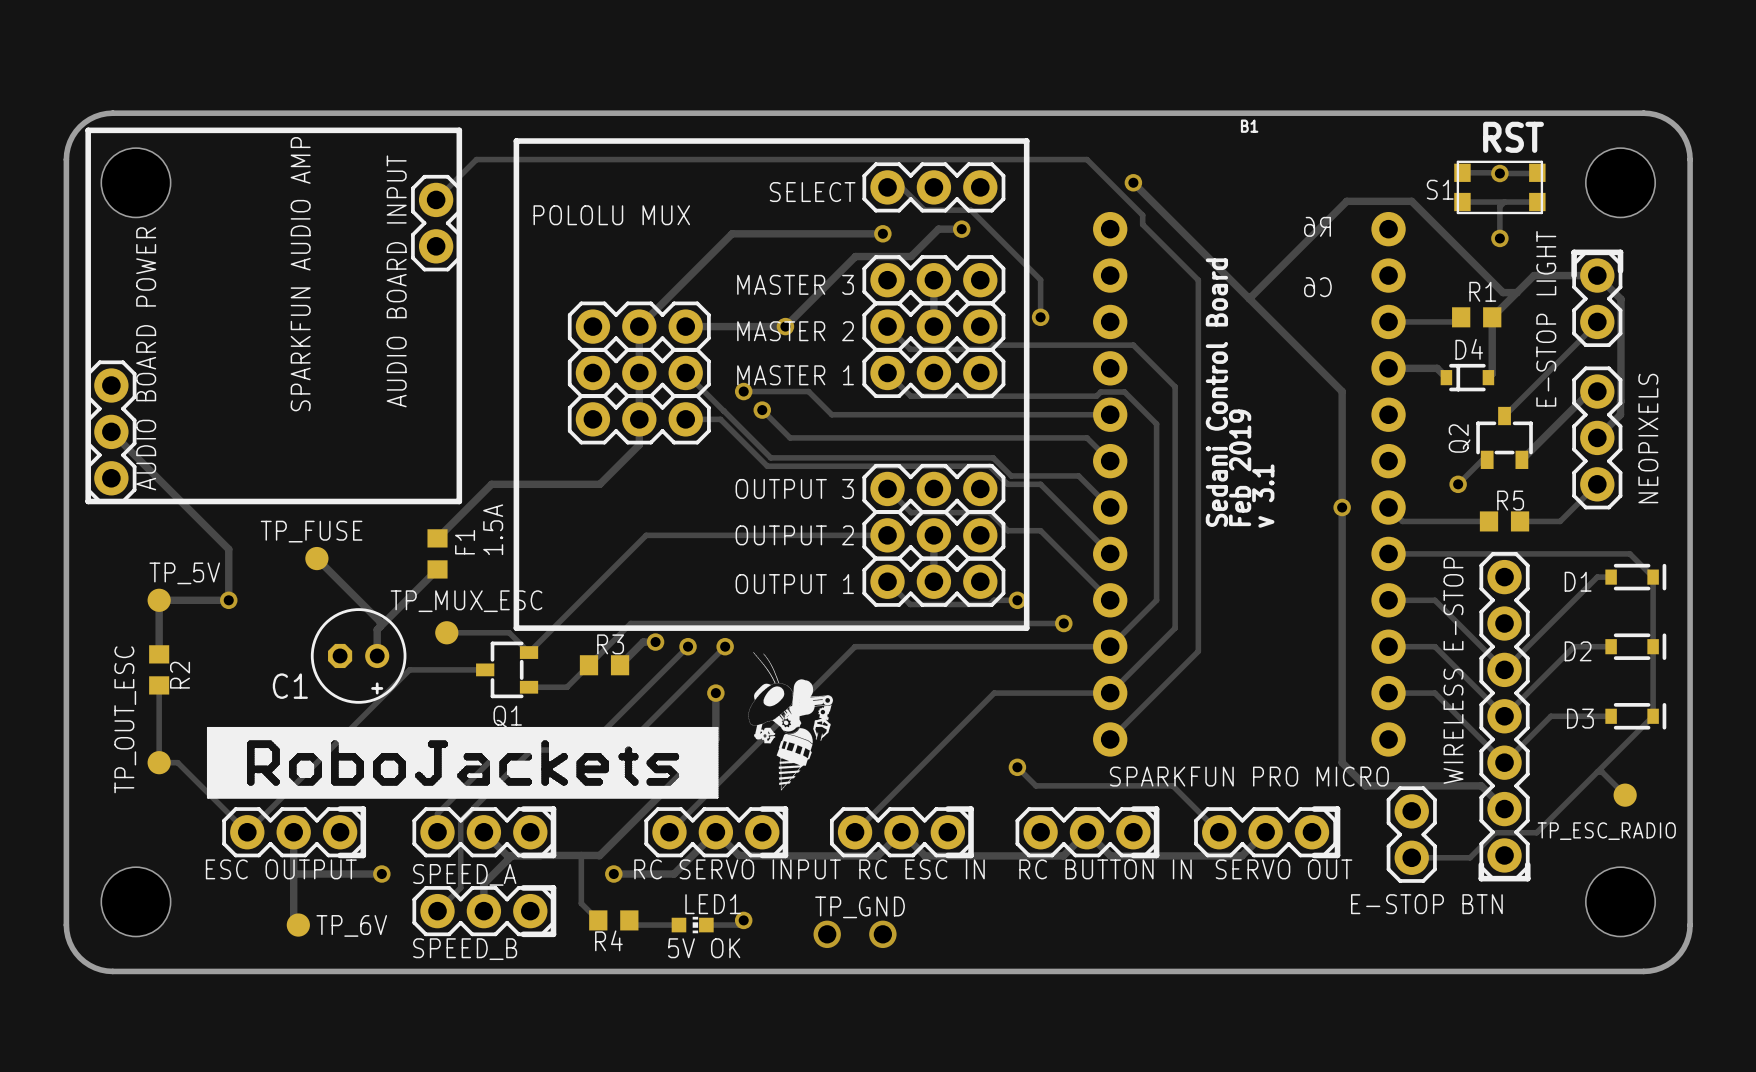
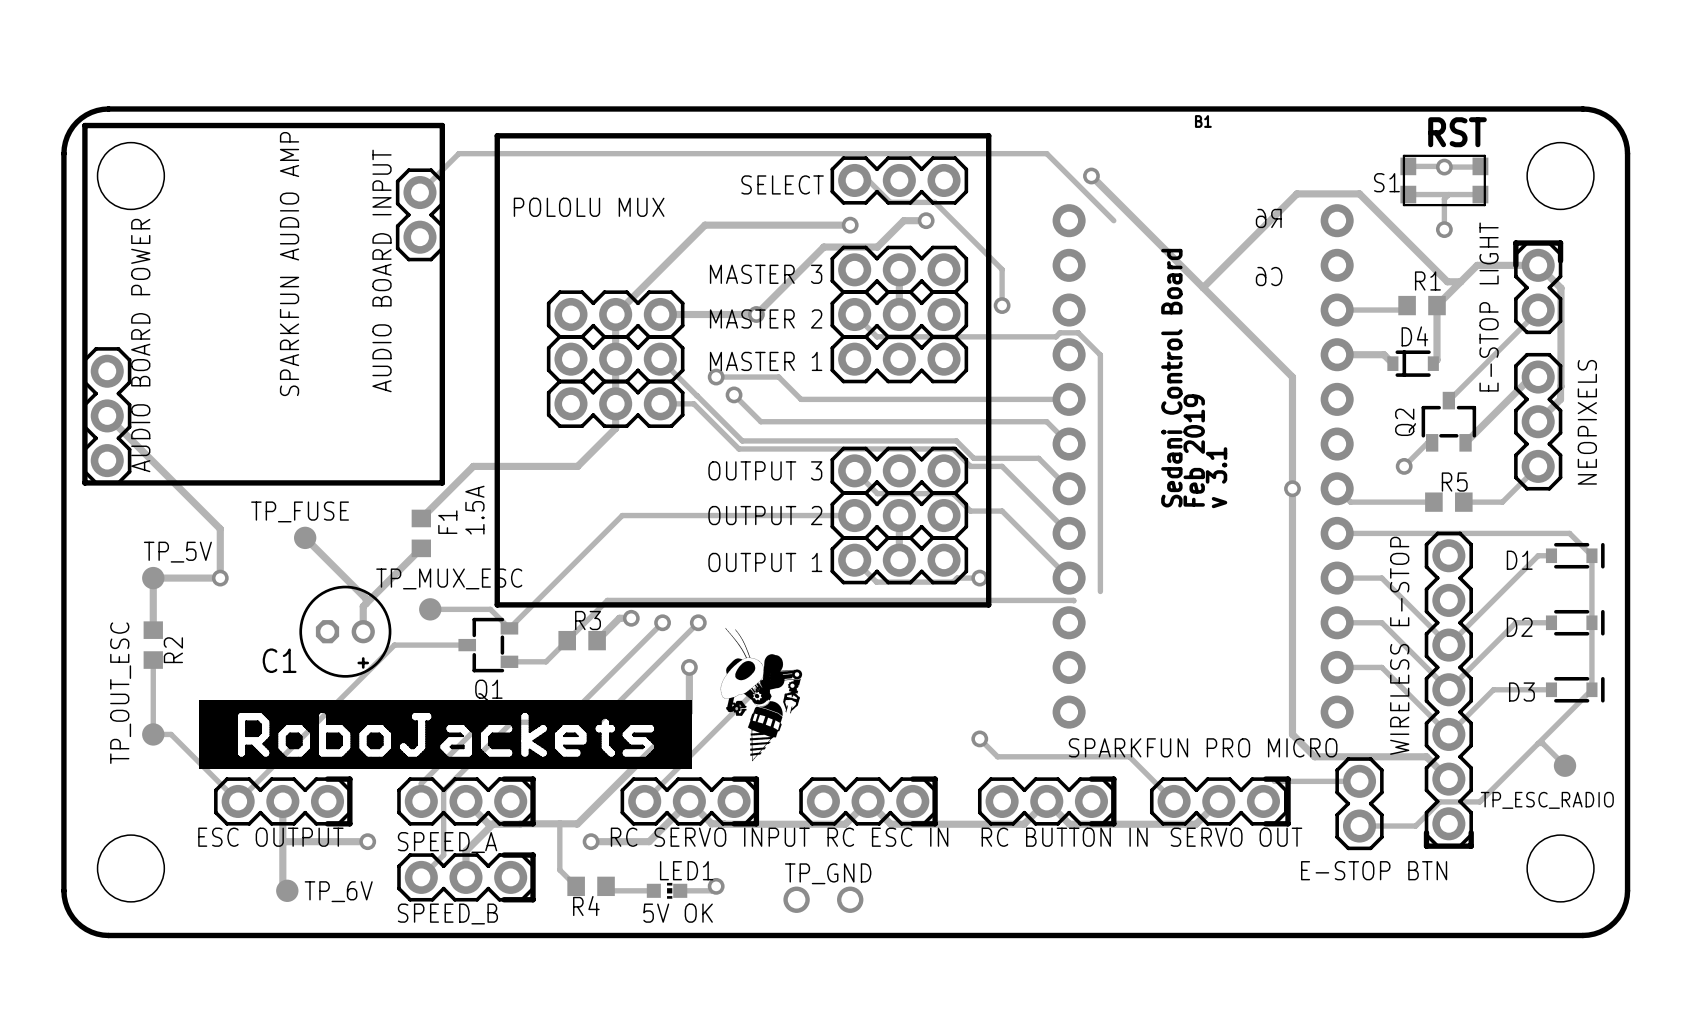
track: (1142, 215) (1142, 224) (1198, 280) (1198, 651) (1110, 739) -> (1100, 207) (1113, 220)
track: (910, 349) (989, 349) (993, 345) (1133, 345) (1175, 386) (1175, 628) (1110, 693) (994, 693) (855, 832) -> (876, 336) (1056, 336) (1060, 332) (1078, 332) (1100, 355) (1100, 591)
track: (887, 372) (910, 396) (1096, 396) (1100, 392) (1124, 392) (1156, 424) (1156, 600) (1110, 646) (855, 646) (808, 693) -> none
track: none -> (1024, 600) (1074, 600)
via: (1063, 623) -> none
track: none -> (1274, 781) (1359, 781)

